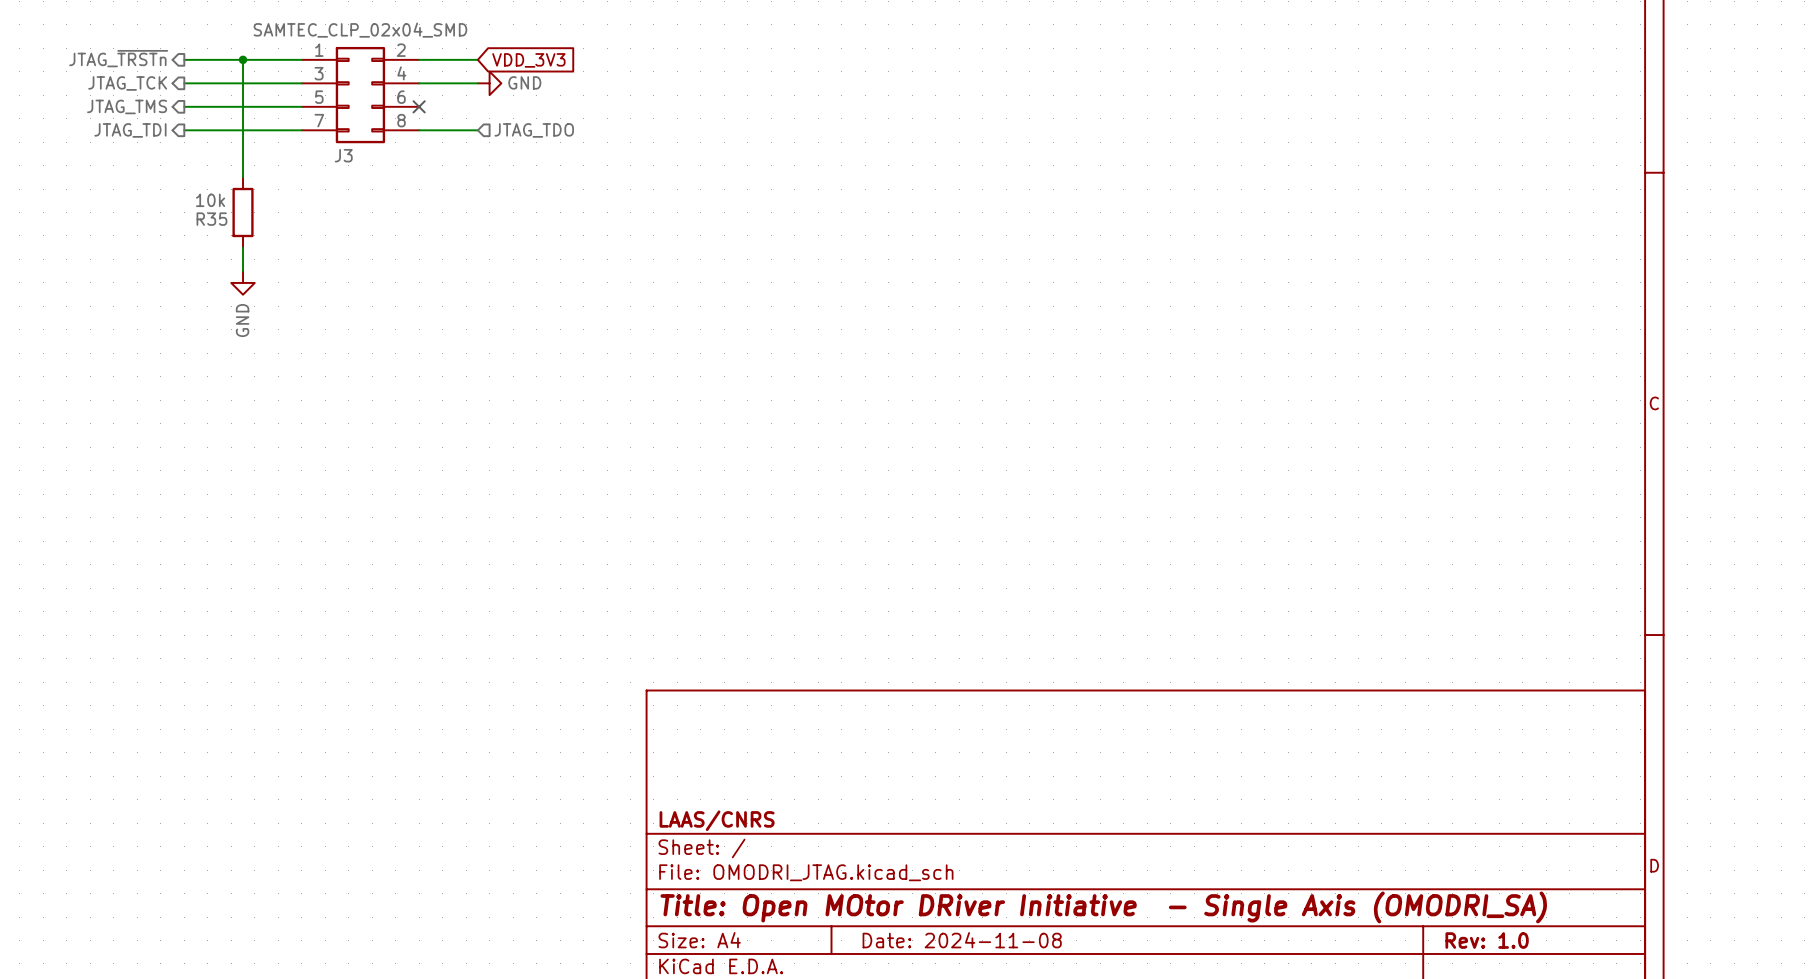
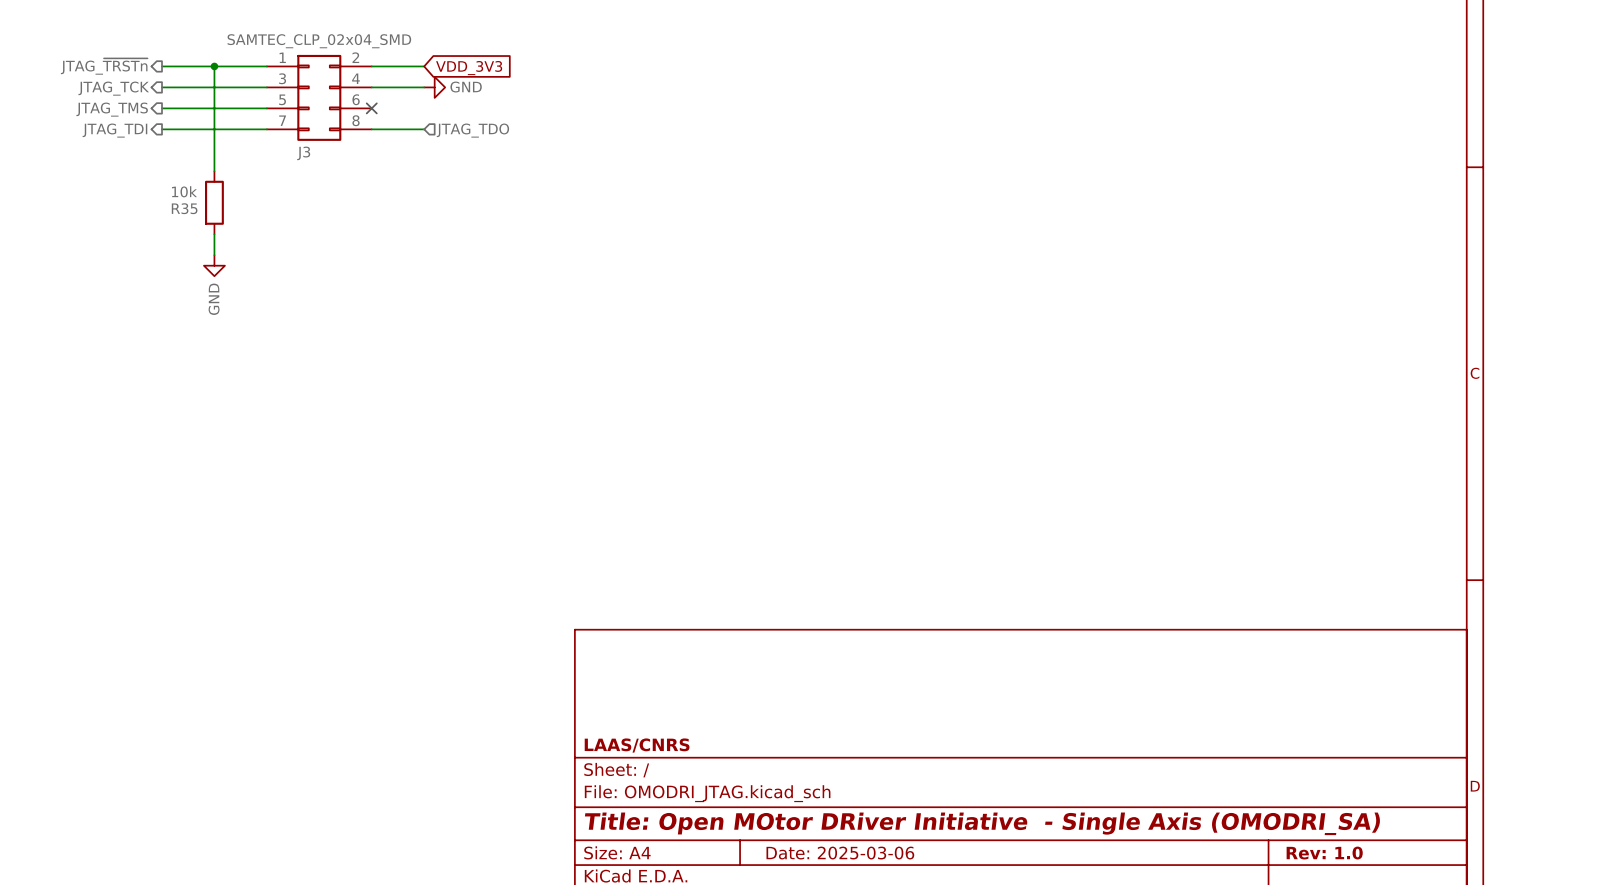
title block: Date: 2024-11-08 (962, 940) -> Date: 2025-03-06 (840, 853)

